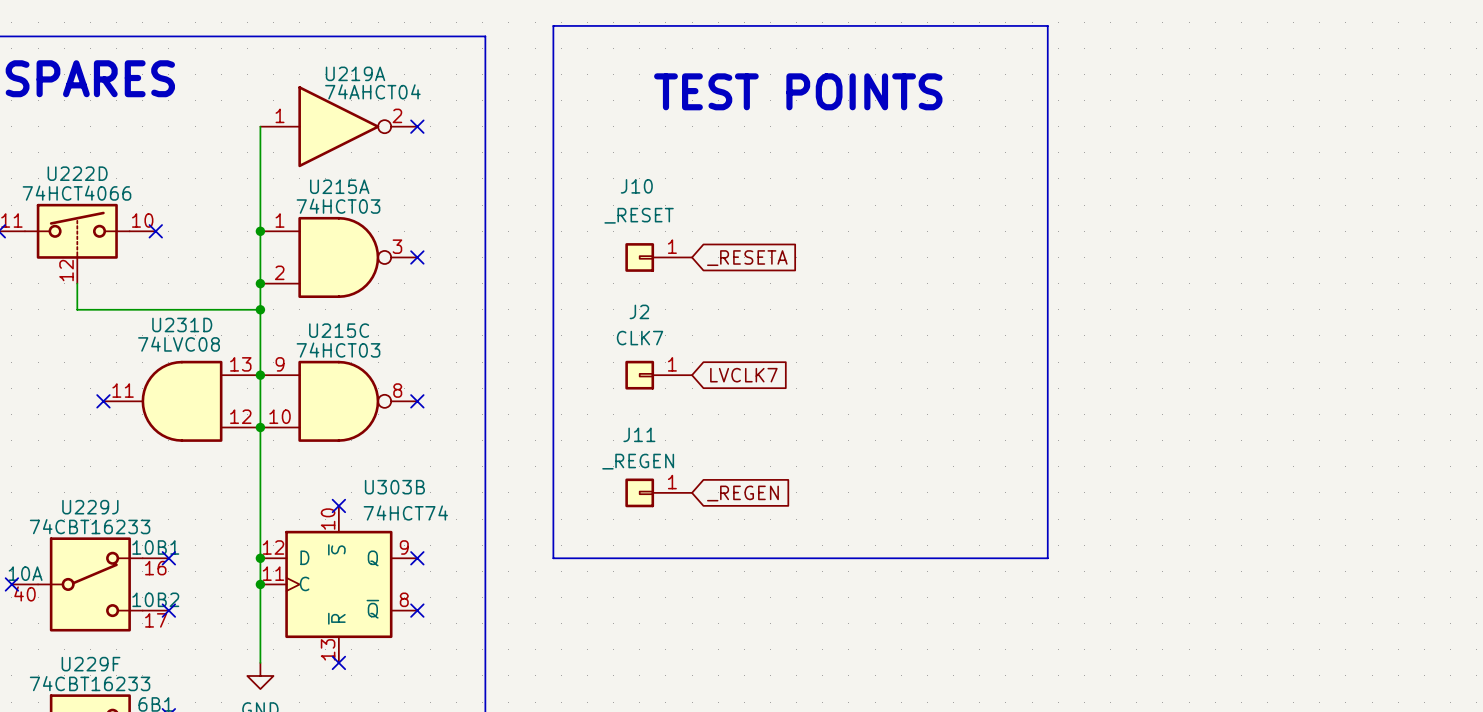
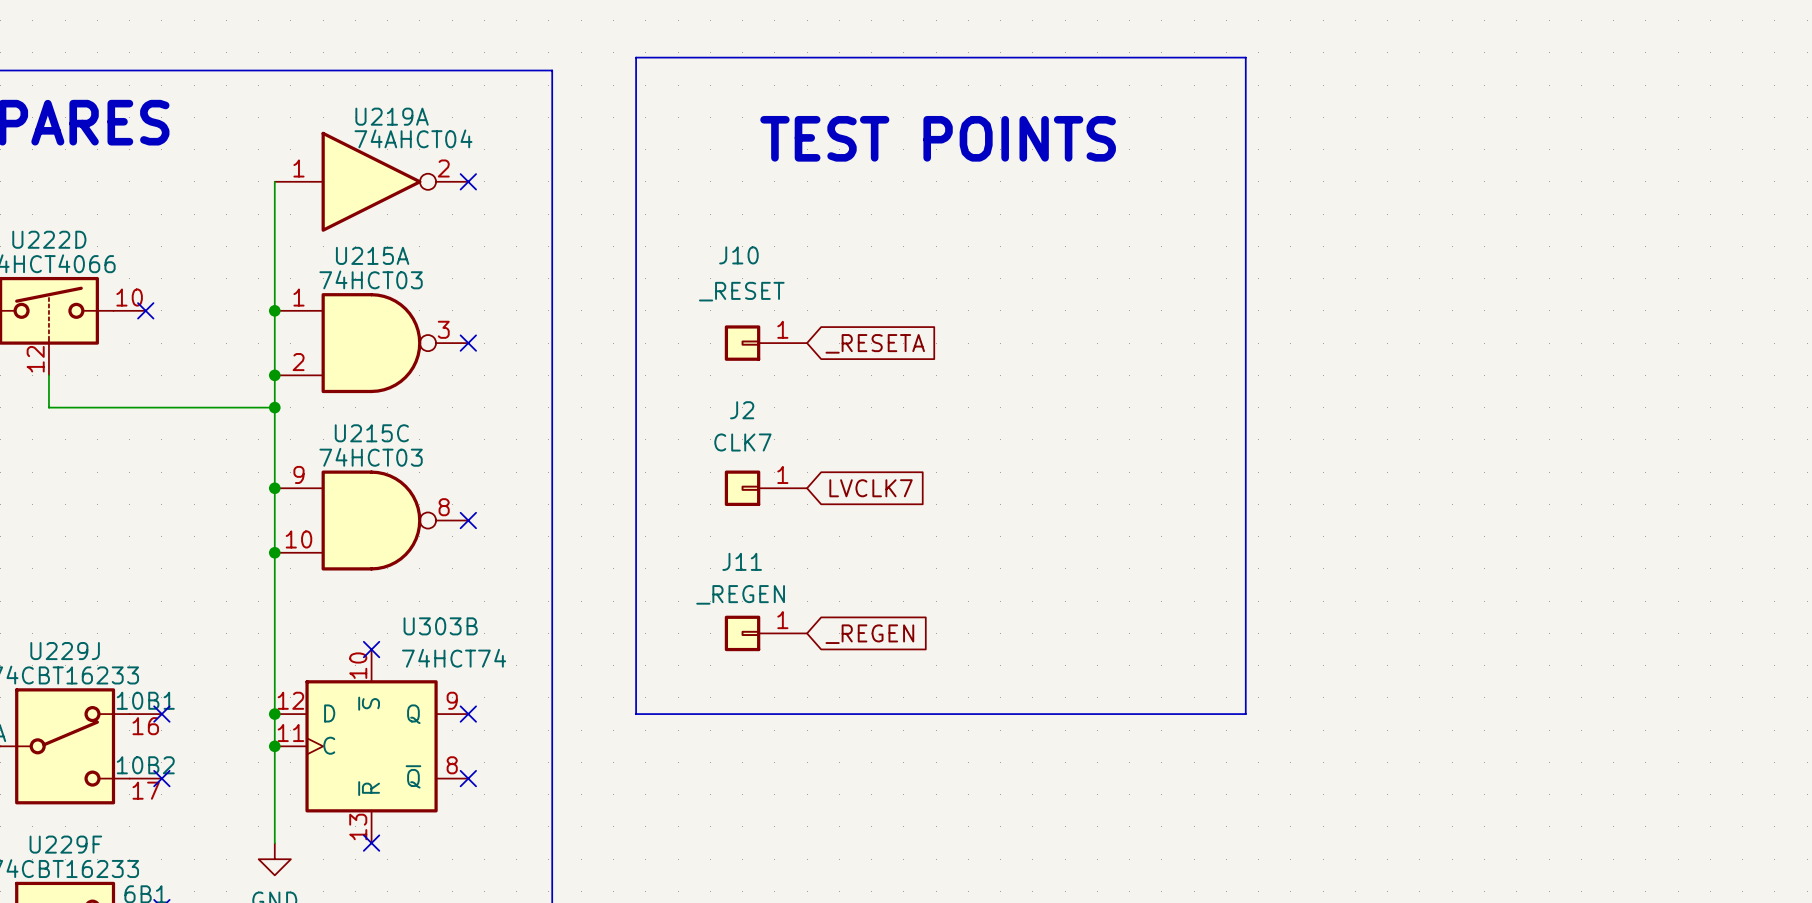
no-connect mark: (103, 401) -> none
U231D: 74LVC08 (181, 401) -> none

